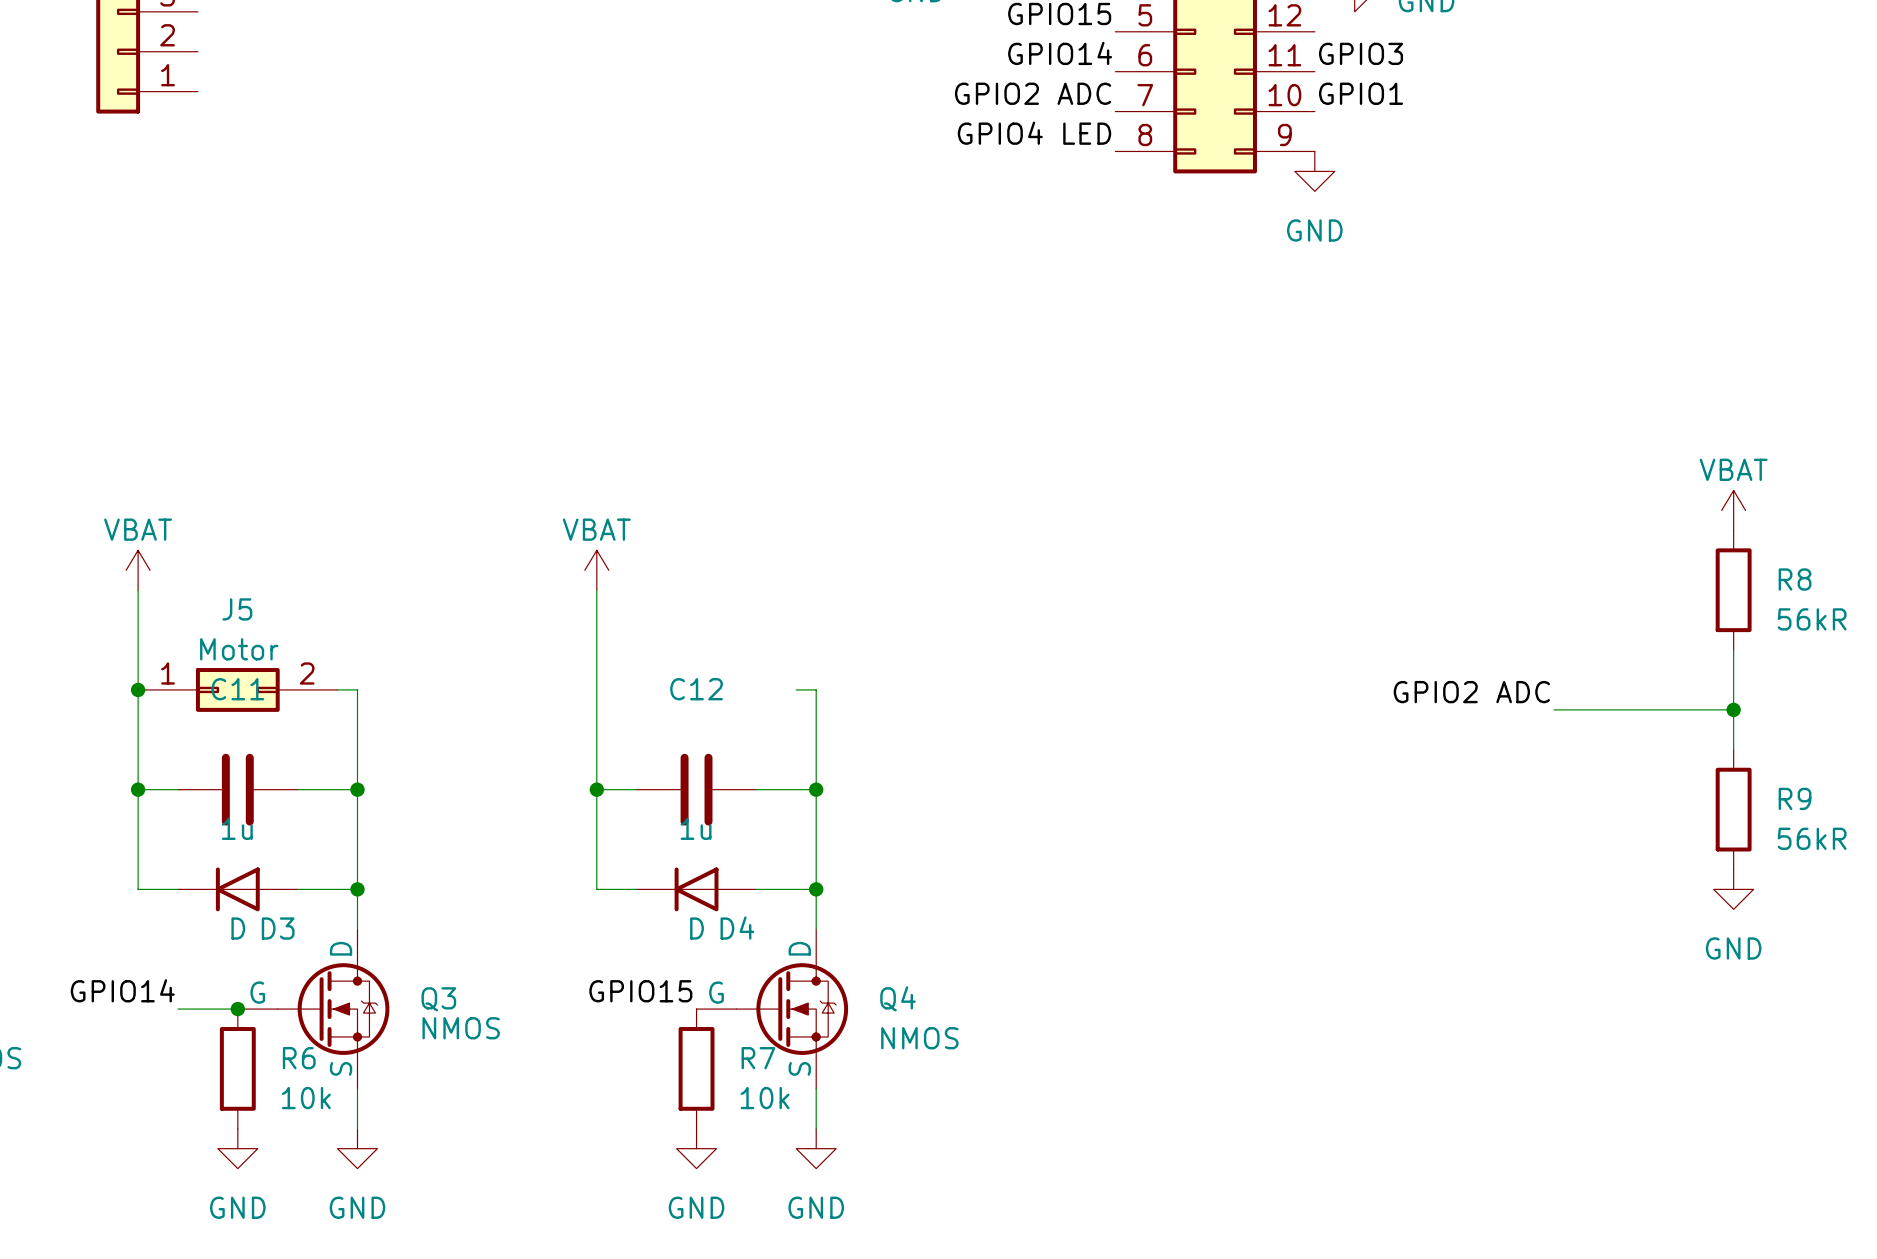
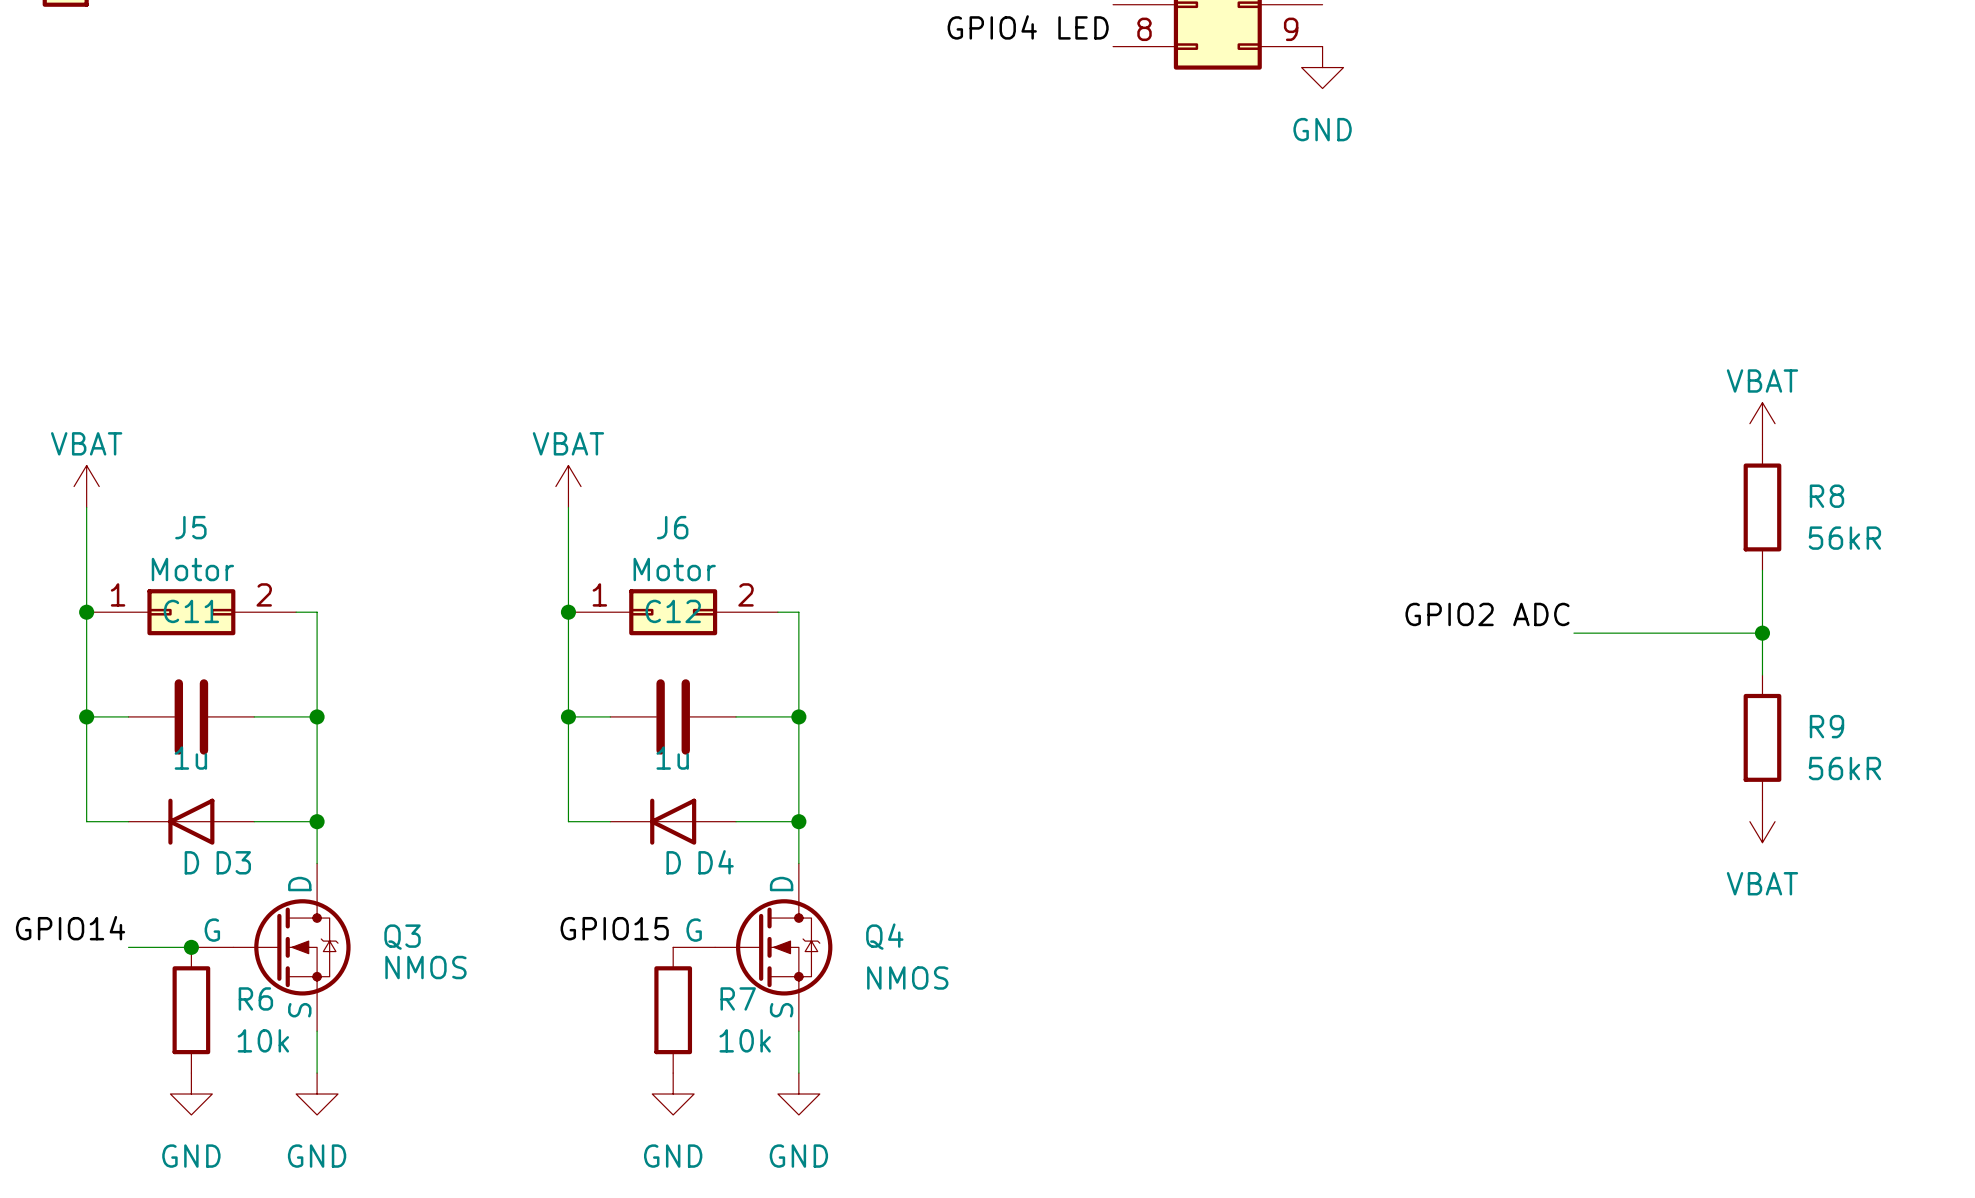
junction: none -> (568, 612)
J6: none -> Motor (673, 612)
power symbol: GND (1733, 889) -> VBAT (1762, 821)

